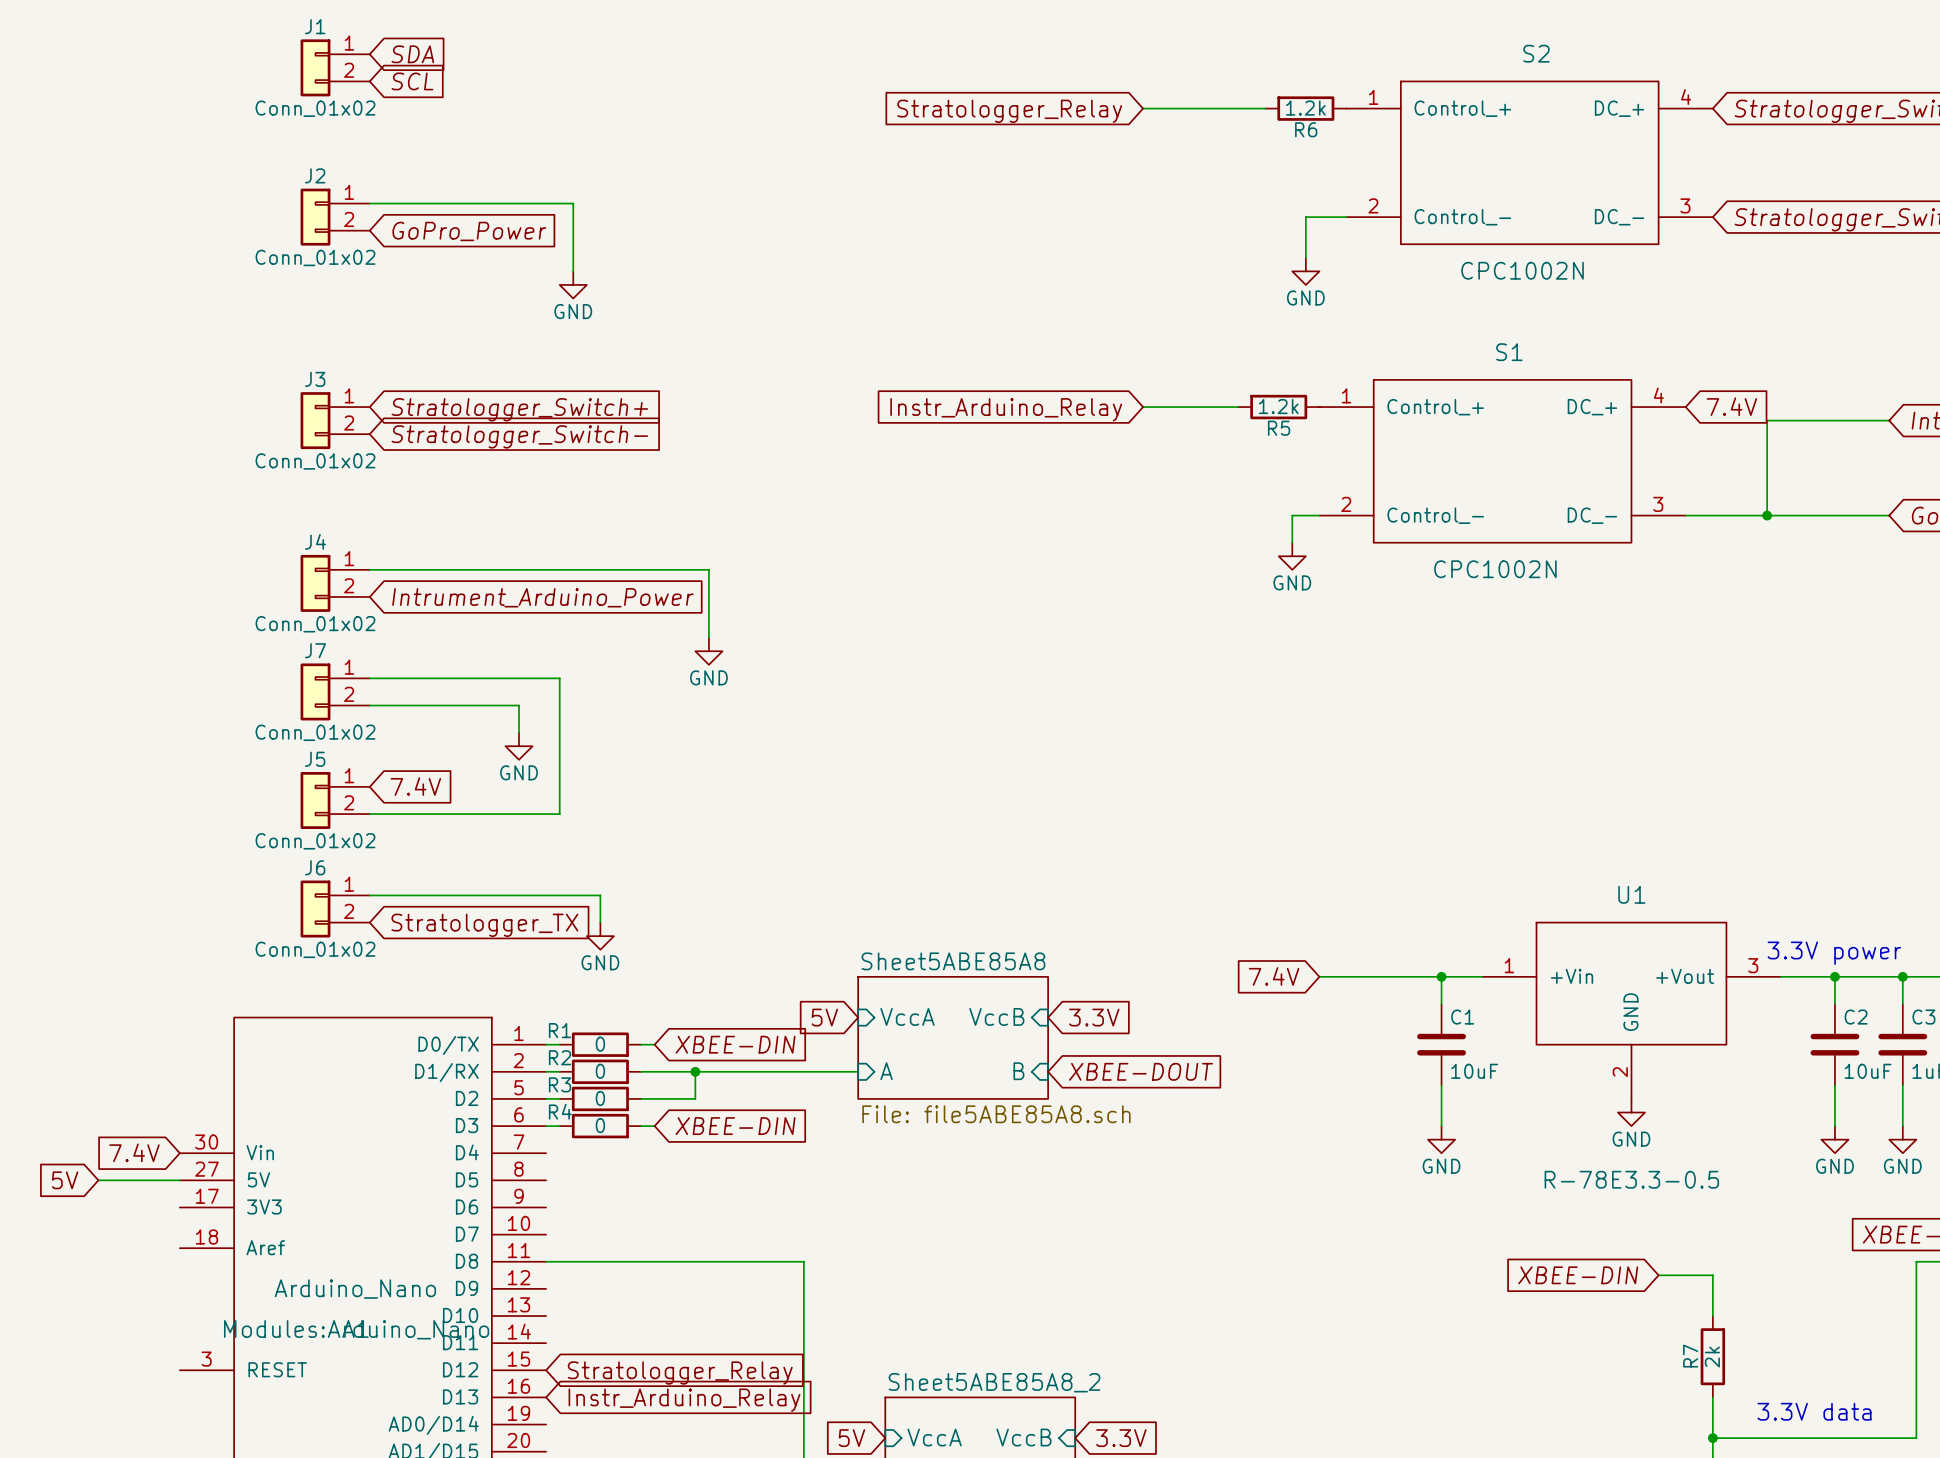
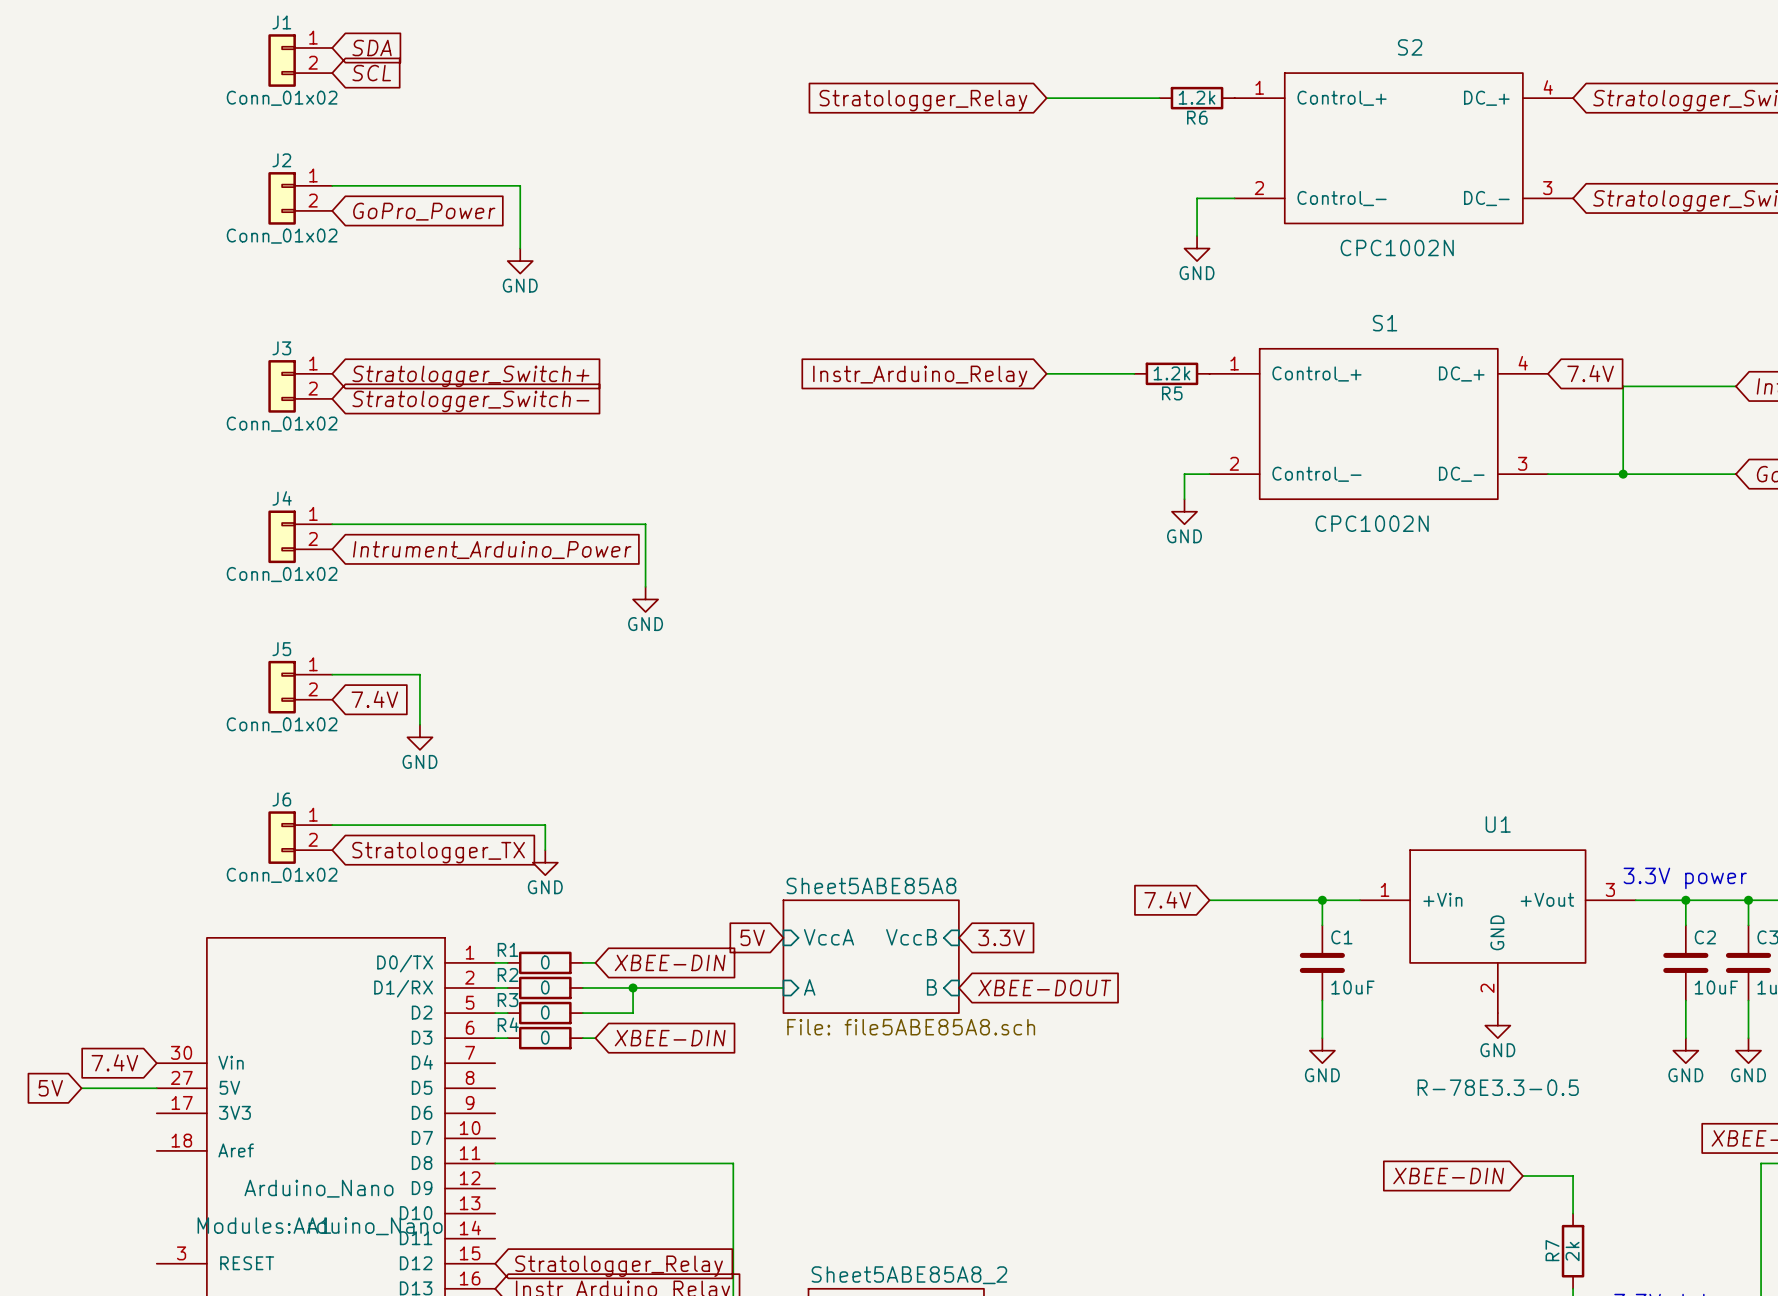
wire: (369, 678) (559, 678) (559, 814) (369, 814) -> none
J7: Conn_01x02 (335, 691) -> none
wire: (369, 705) (519, 705) (519, 732) -> none
wire: none -> (332, 674) (419, 674) (419, 724)
power symbol position: GND (519, 746) -> GND (419, 737)
global label position: 7.4V (415, 786) -> 7.4V (374, 699)
J5 position: (335, 800) -> (300, 687)

